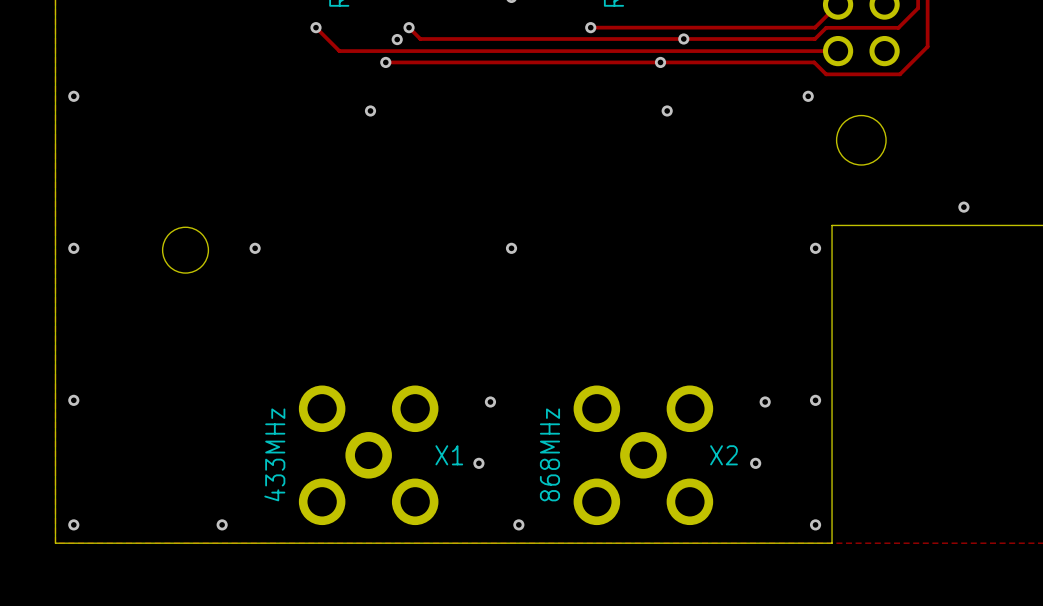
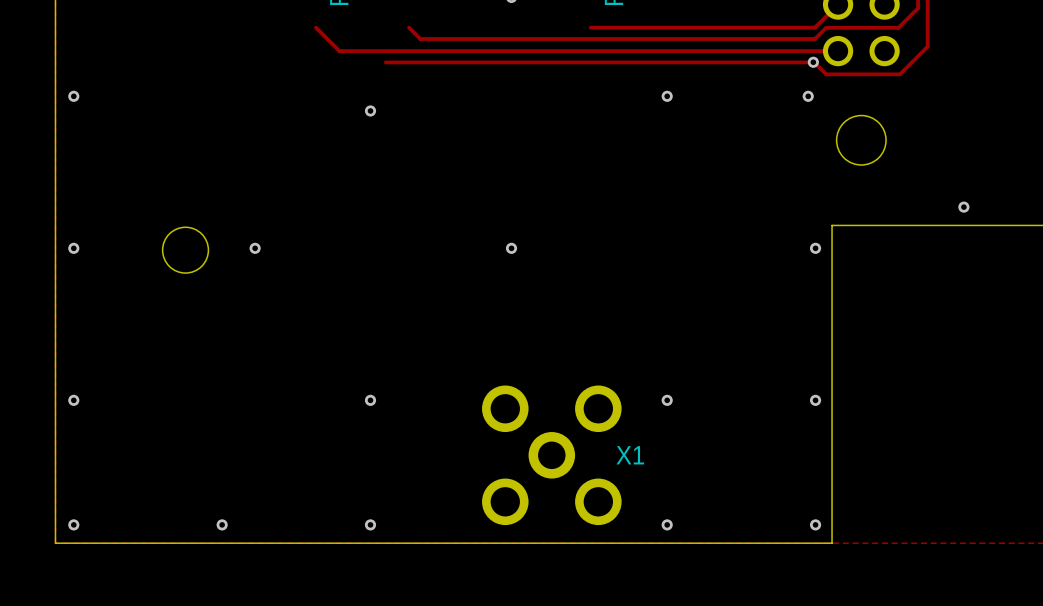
via: (316, 27) -> none
via: (409, 27) -> none
via: (590, 27) -> none
via: (683, 38) -> none
via: (397, 39) -> none
via: (385, 62) -> none
via: (660, 62) -> none
via: none -> (813, 62)
via position: (667, 110) -> (667, 96)
via: none -> (370, 400)
via: none -> (667, 400)
via: (490, 401) -> none
via: (765, 401) -> none
text: 433MHz (274, 454) -> none
text: 868MHz (549, 454) -> none
X1 position: (368, 455) -> (551, 455)
X2: (643, 455) -> none
via: (478, 463) -> none
via: (755, 463) -> none
via: none -> (370, 524)
via: (518, 524) -> none
via: none -> (667, 524)

